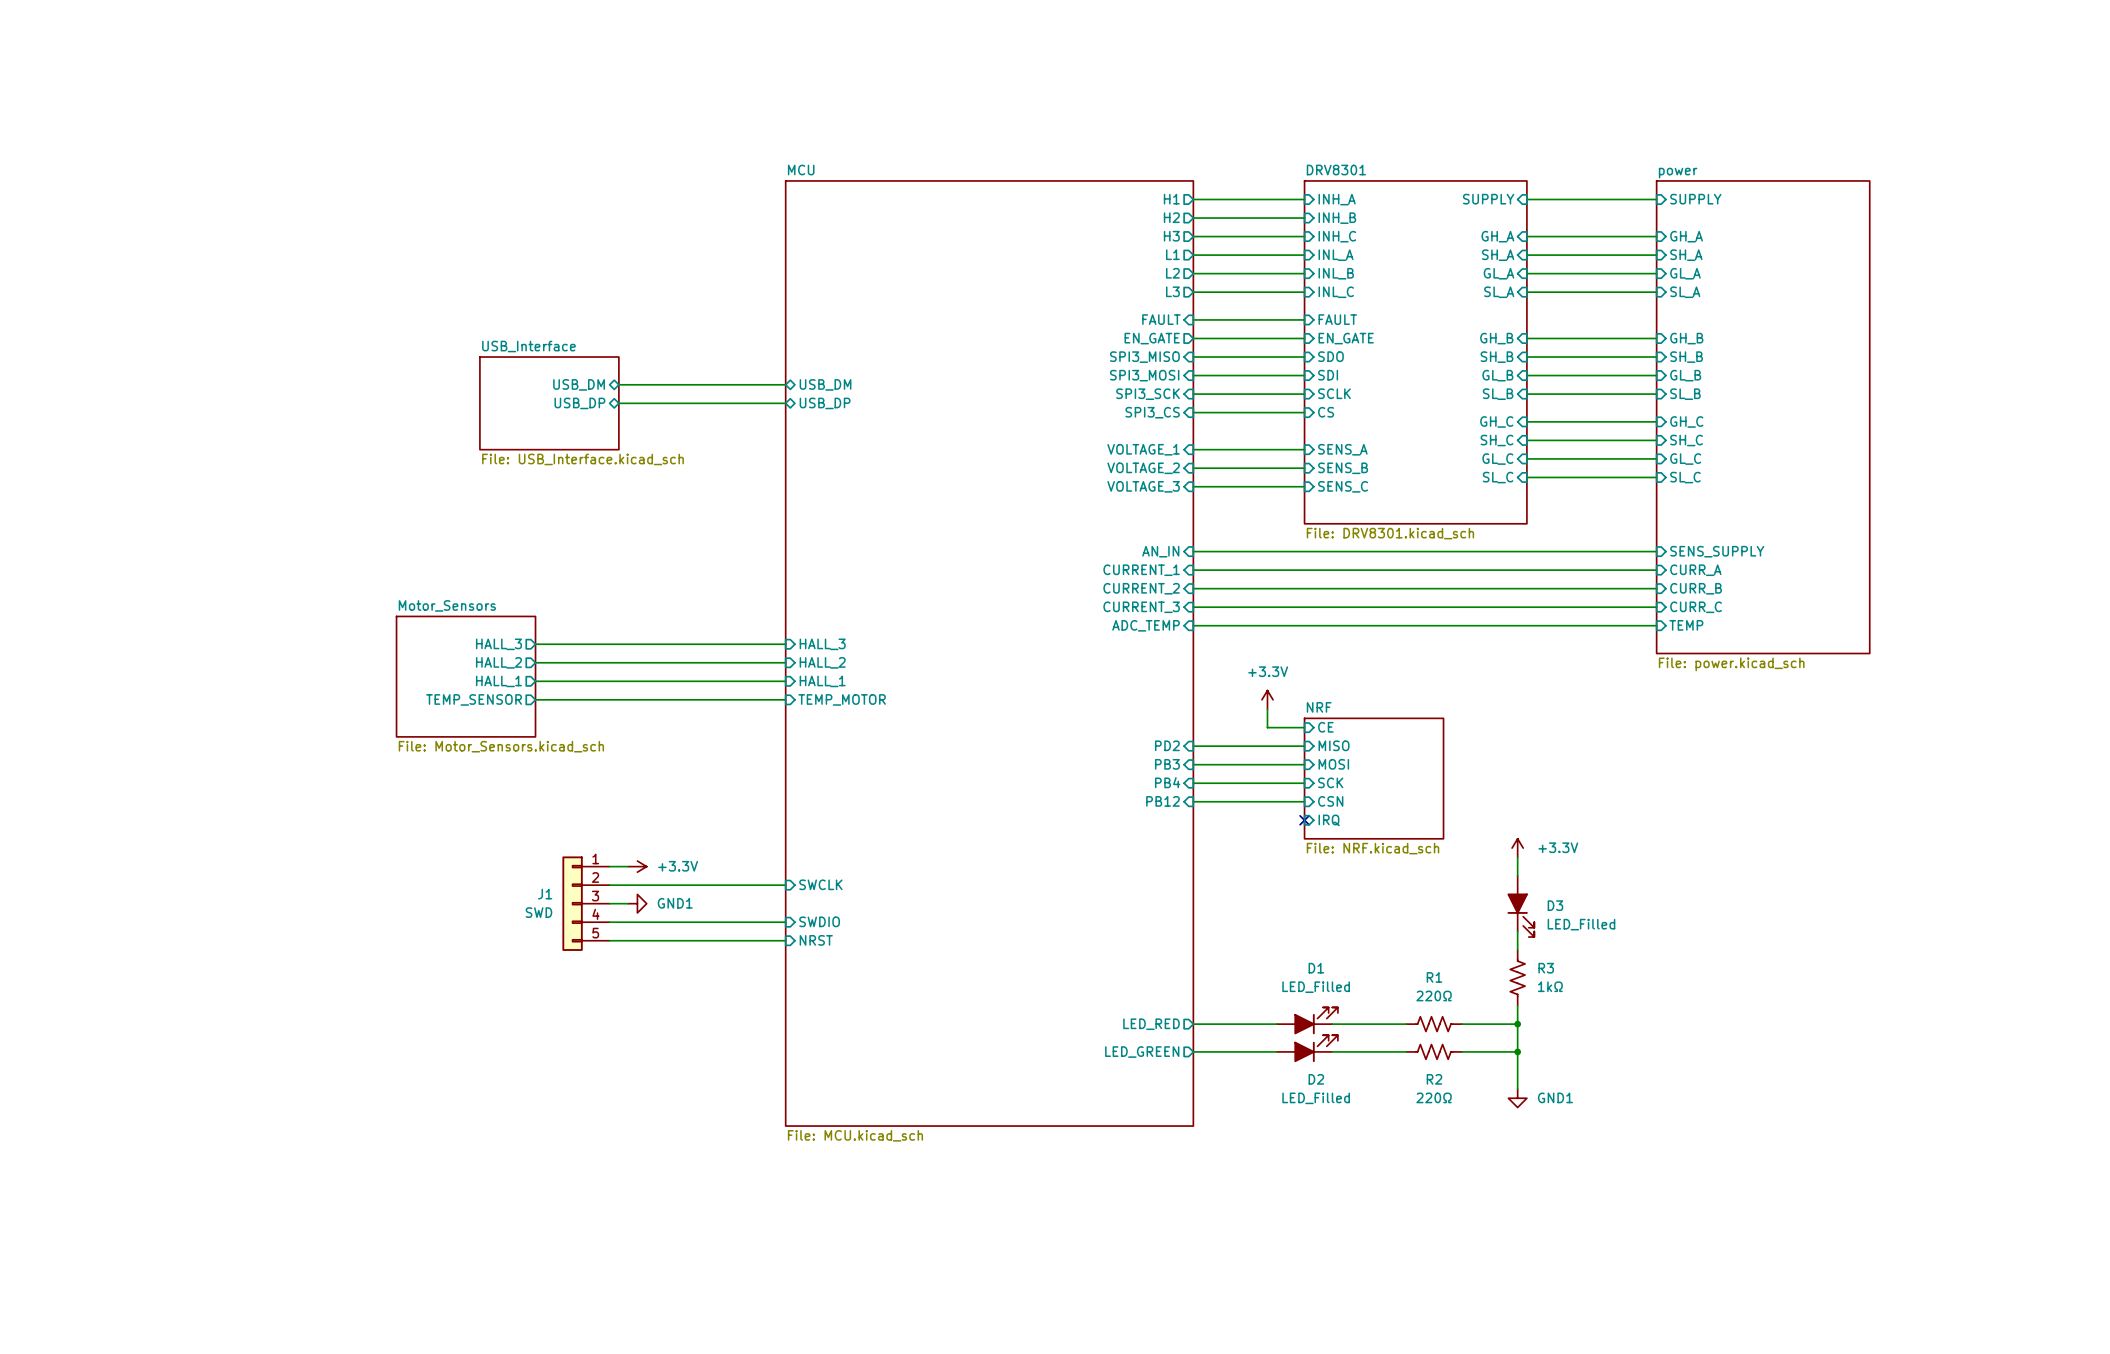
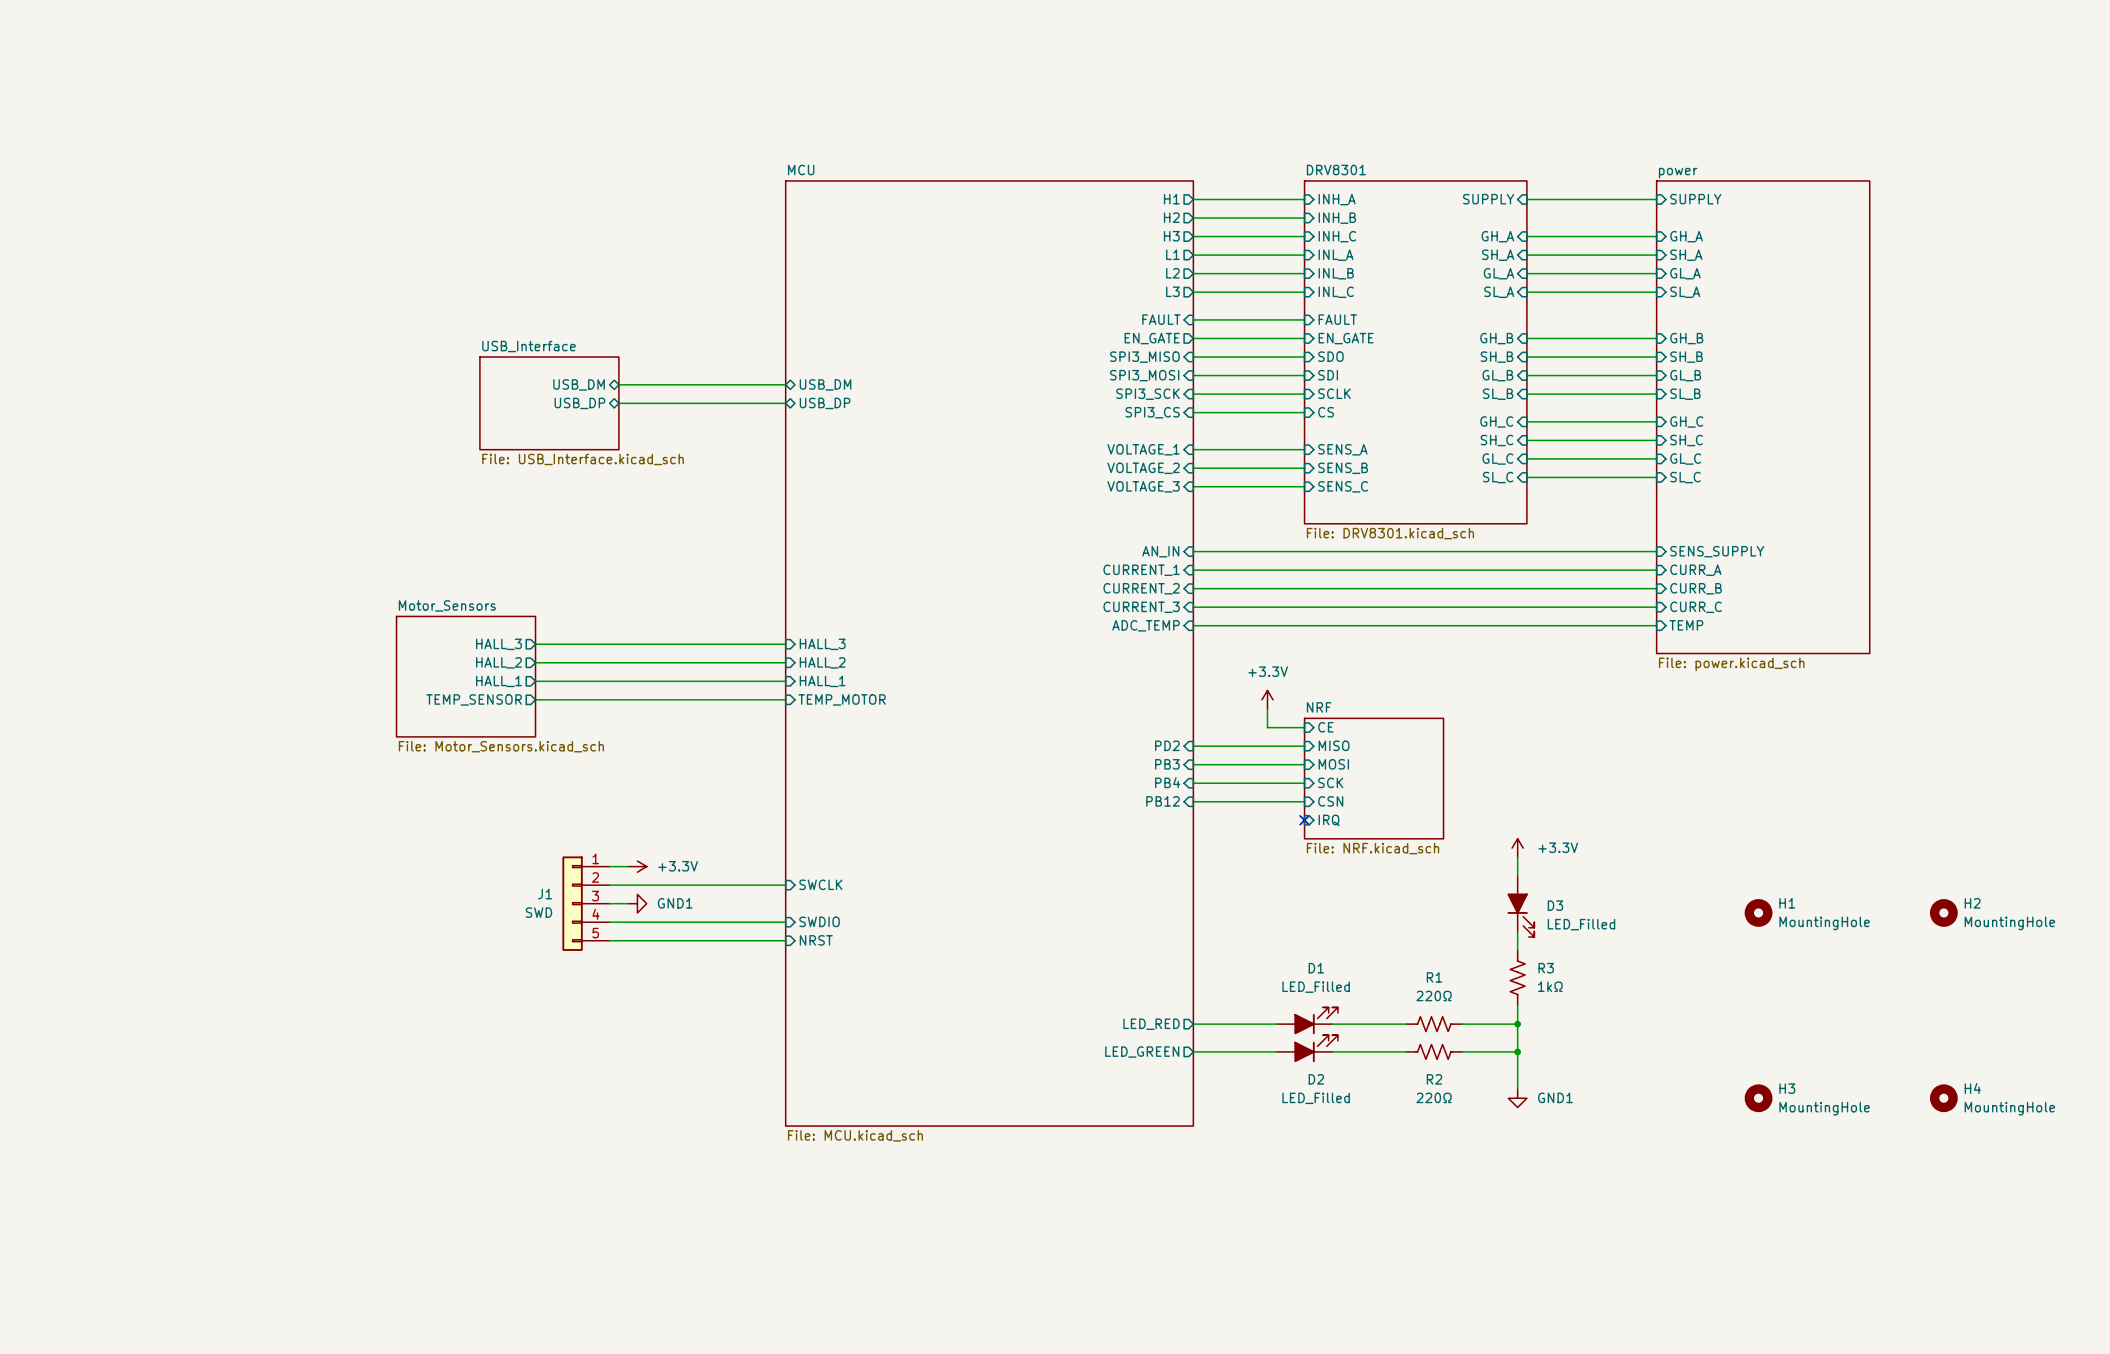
H1: none -> MountingHole (1758, 912)
H2: none -> MountingHole (1943, 912)
H3: none -> MountingHole (1758, 1098)
H4: none -> MountingHole (1943, 1098)

